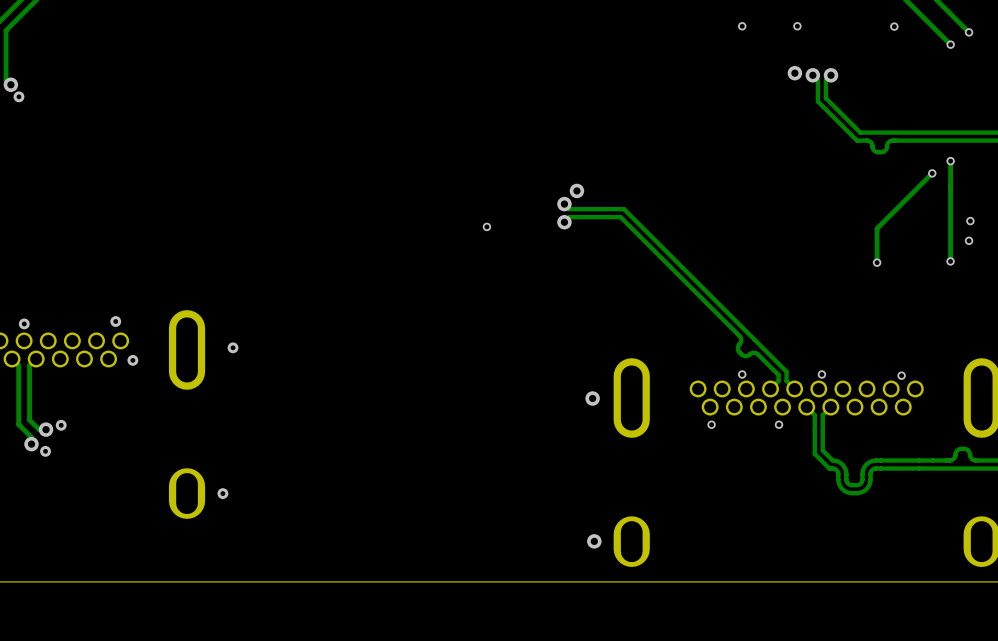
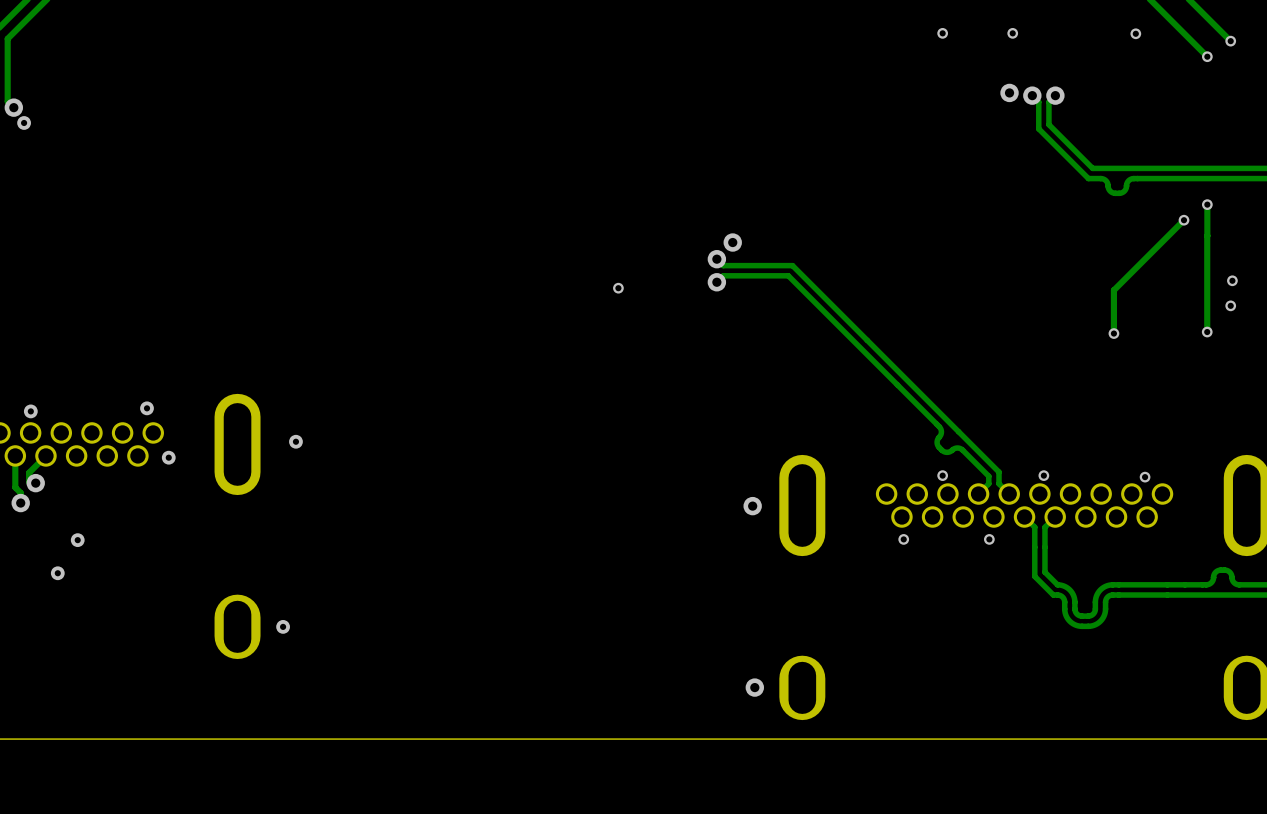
track: (12, 359) (18, 365) (18, 424) (31, 437) (31, 444) -> (15, 455) (15, 487) (20, 492) (20, 503)
track: (29, 365) (29, 420) (39, 429) (46, 429) -> (37, 464) (29, 472) (29, 481) (35, 483)
via: none -> (35, 483)
via: none -> (20, 503)
via: (46, 429) -> none
via: (31, 444) -> none

